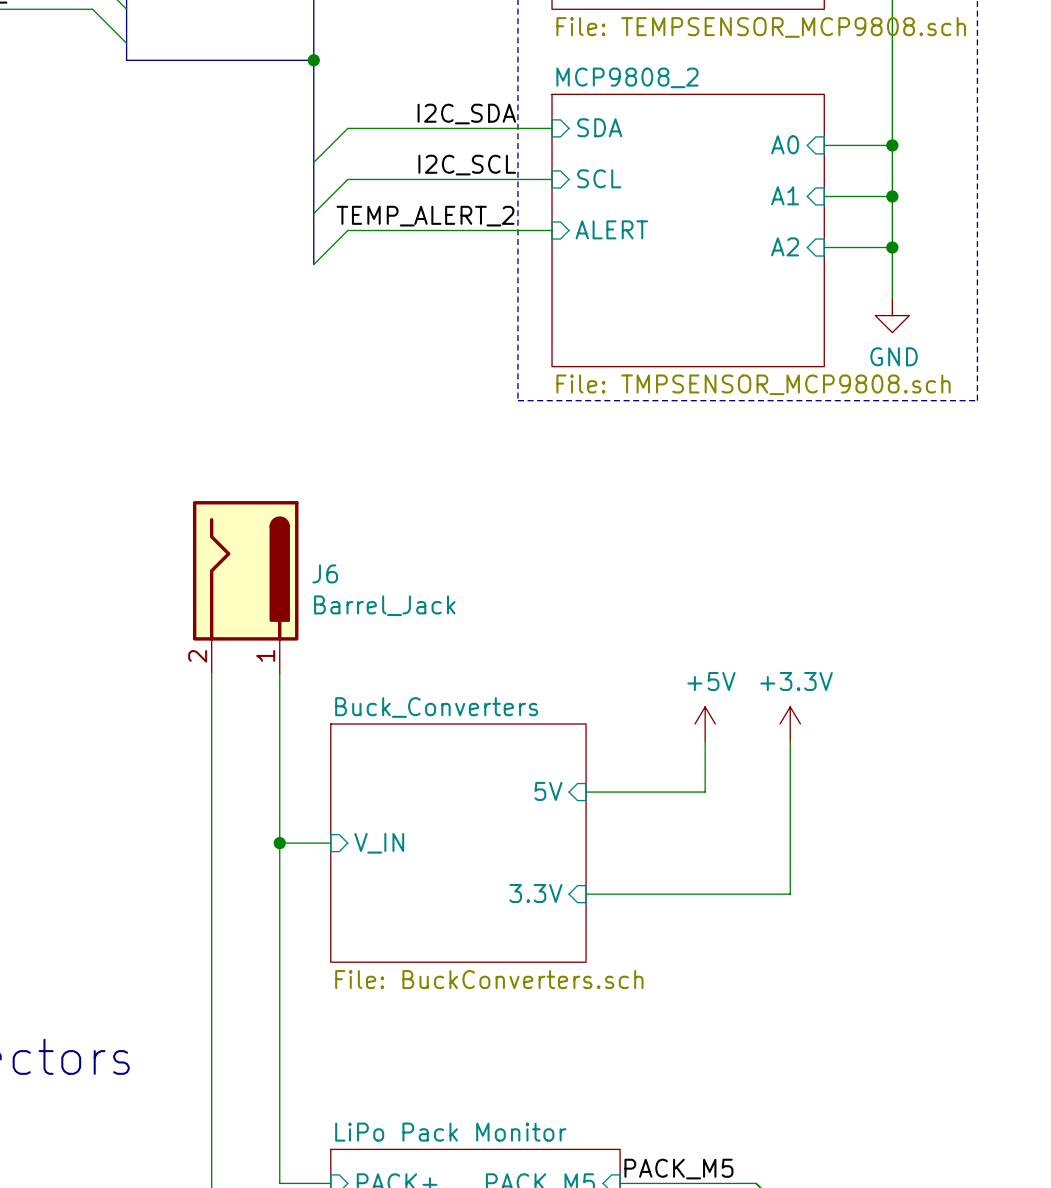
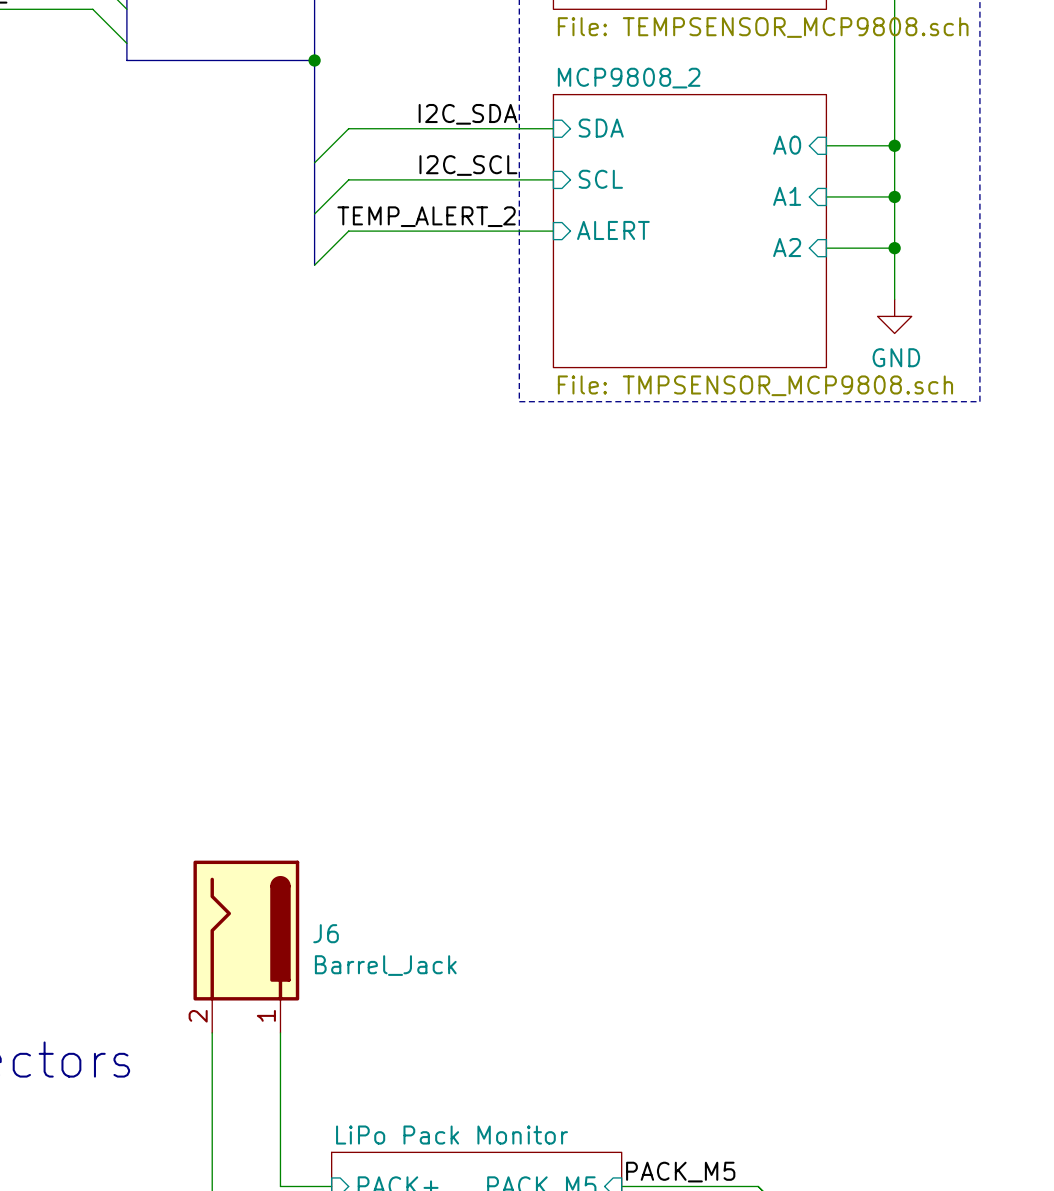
J6 position: (245, 587) -> (246, 946)
wire: (211, 672) (211, 1030) -> none
wire: (279, 672) (279, 1030) -> none
power symbol: +5V (705, 723) -> none
power symbol: +3.3V (790, 723) -> none
wire: (705, 741) (705, 792) (586, 792) -> none
wire: (790, 741) (790, 894) (586, 894) -> none
sheet pin: 5V (548, 791) -> none
wire: (279, 843) (330, 843) -> none
junction: (279, 843) -> none
sheet pin: V_IN (379, 843) -> none
sheet Buck_Converters: File: BuckConverters.sch (458, 843) -> none
sheet pin: 3.3V (535, 893) -> none

